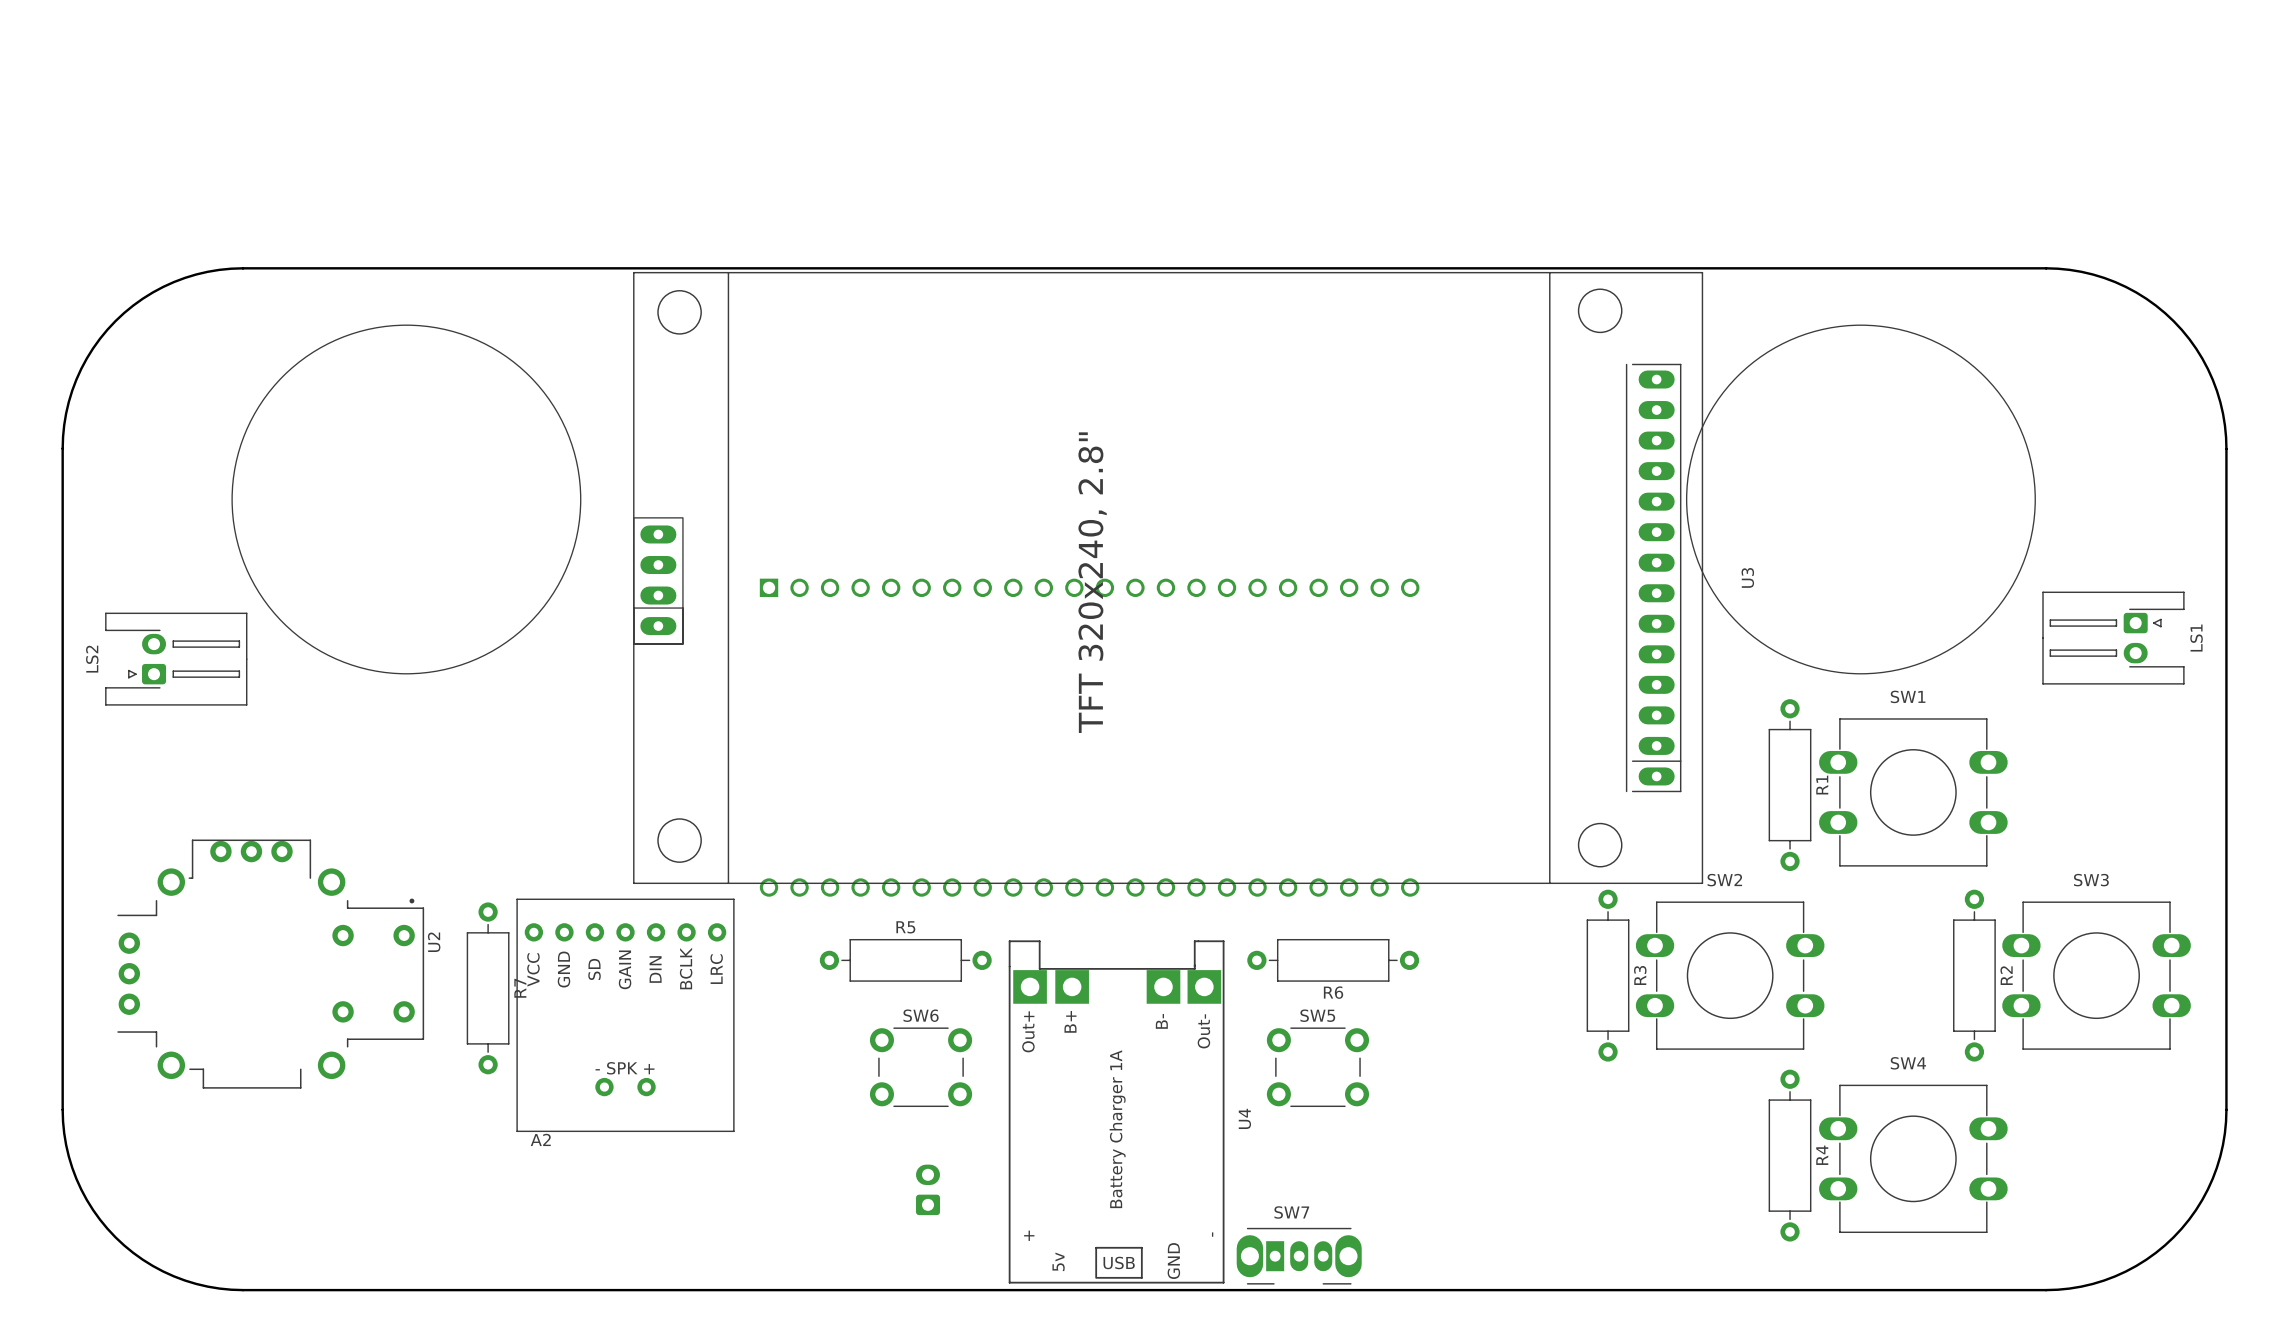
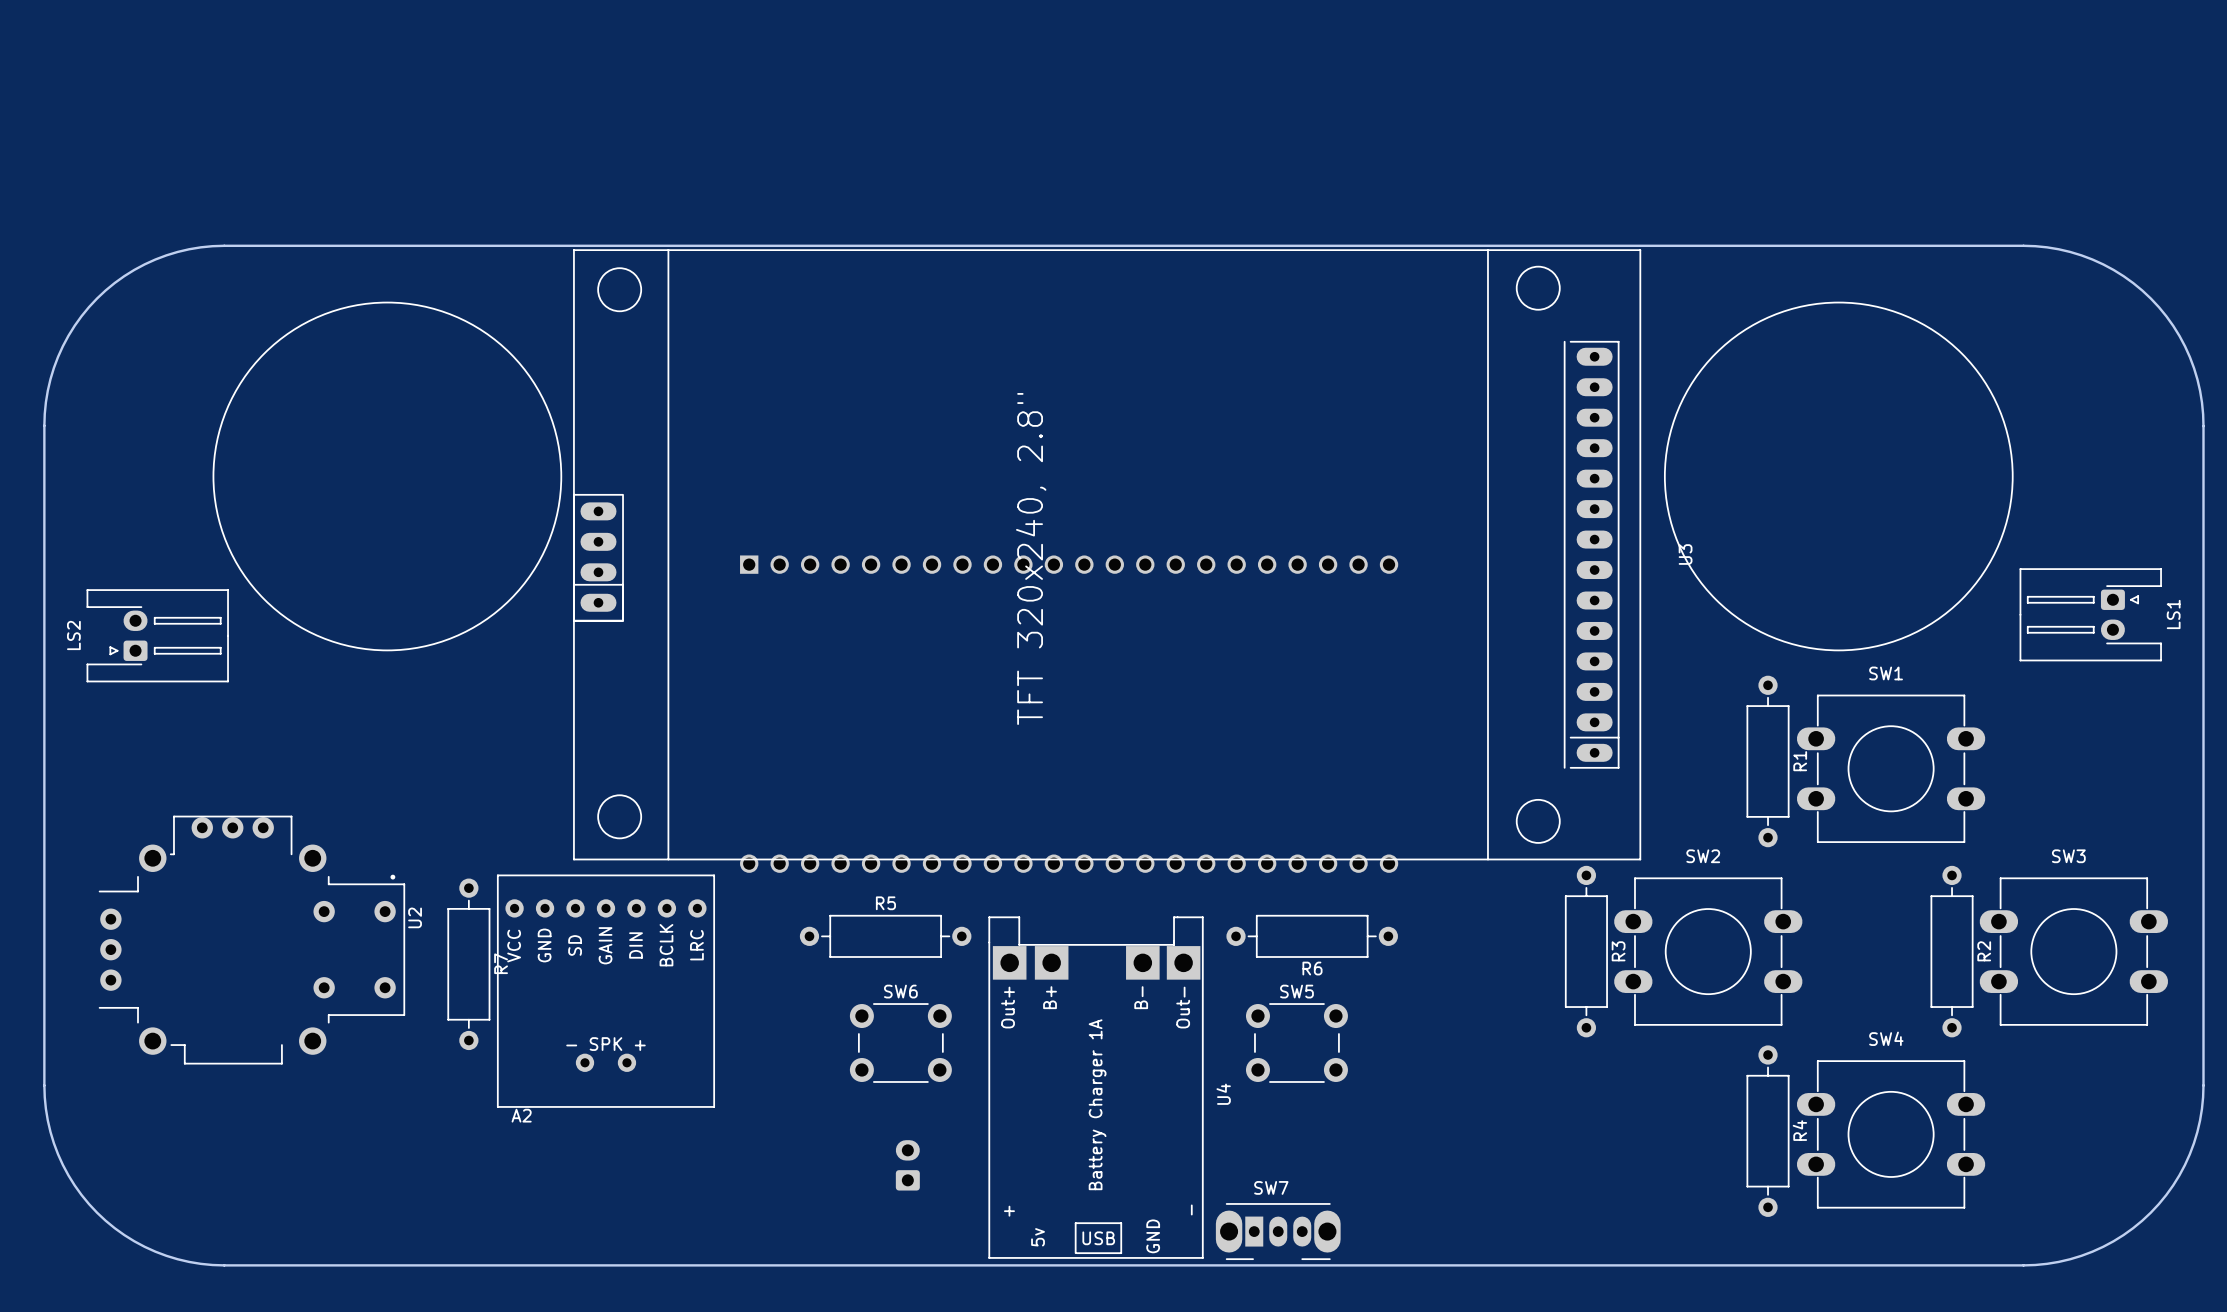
U3 position: (1168, 577) -> (1107, 554)

